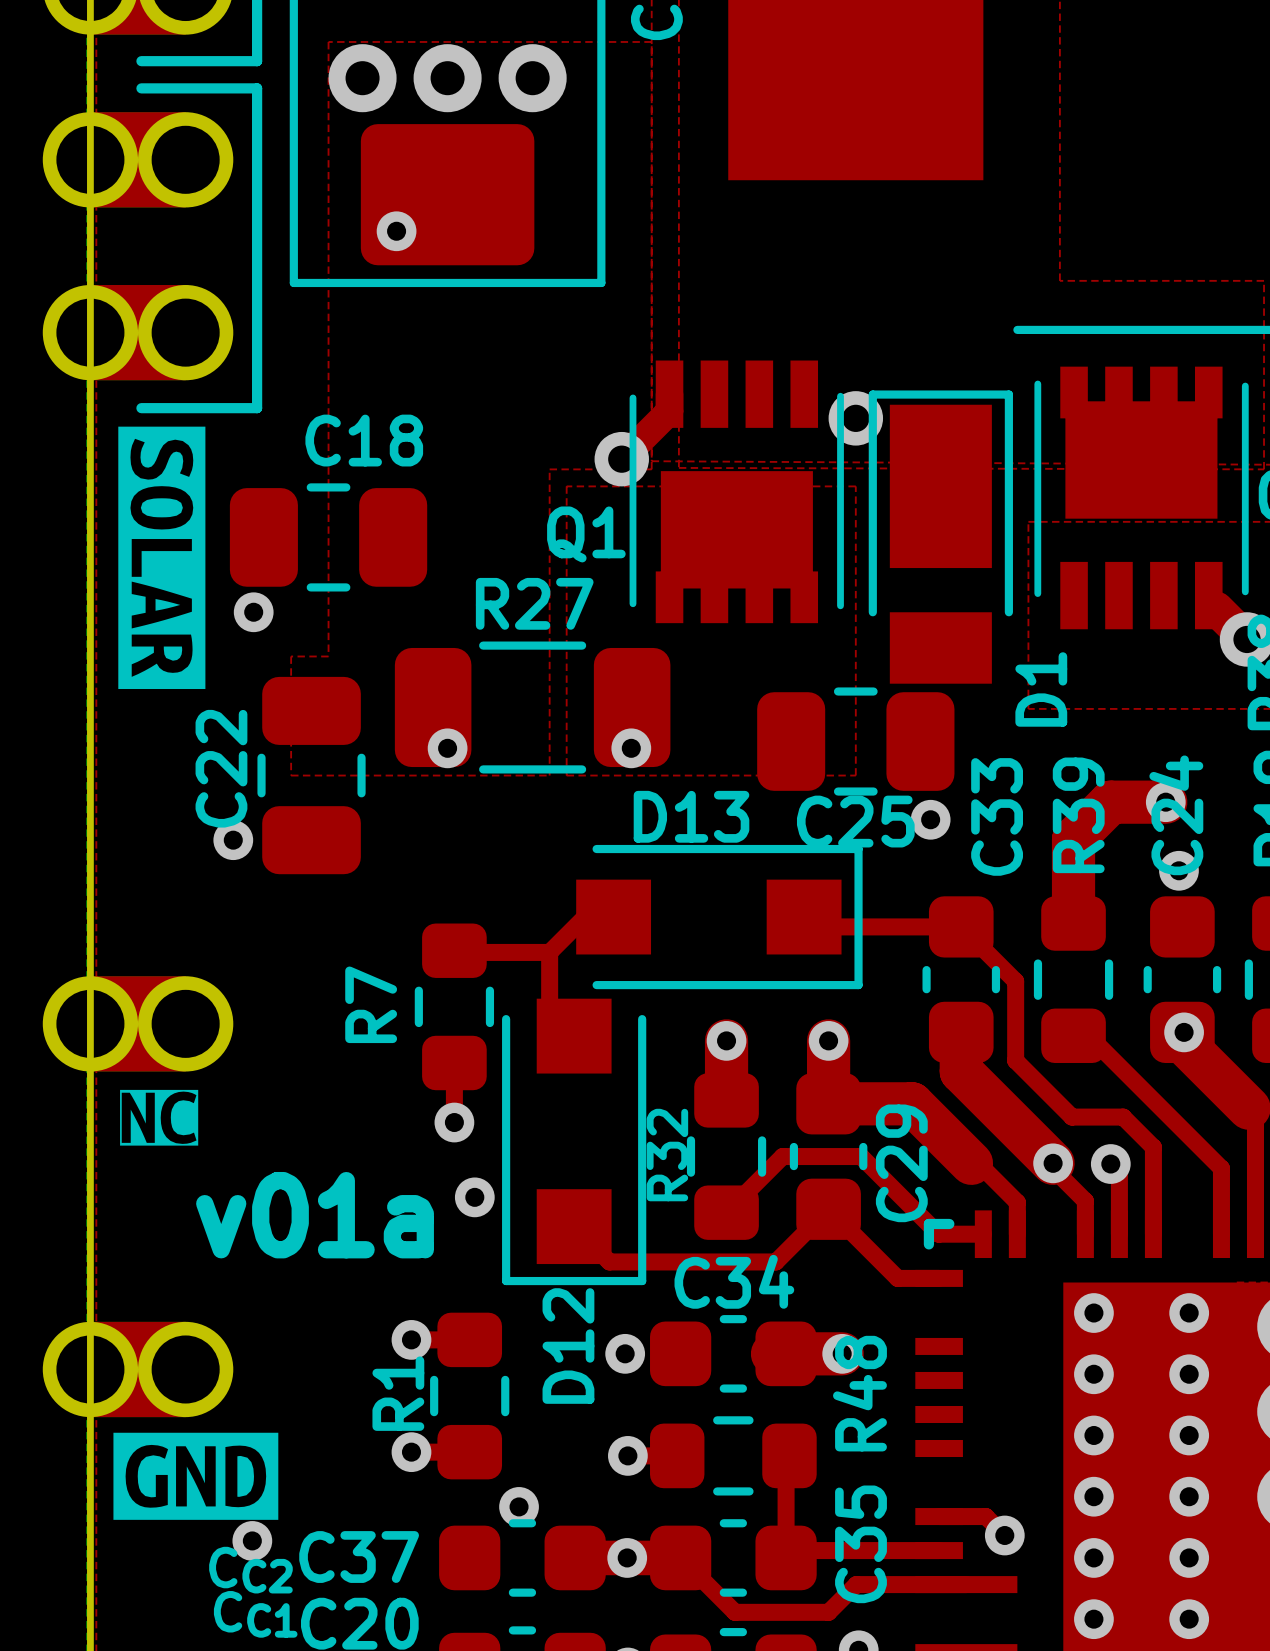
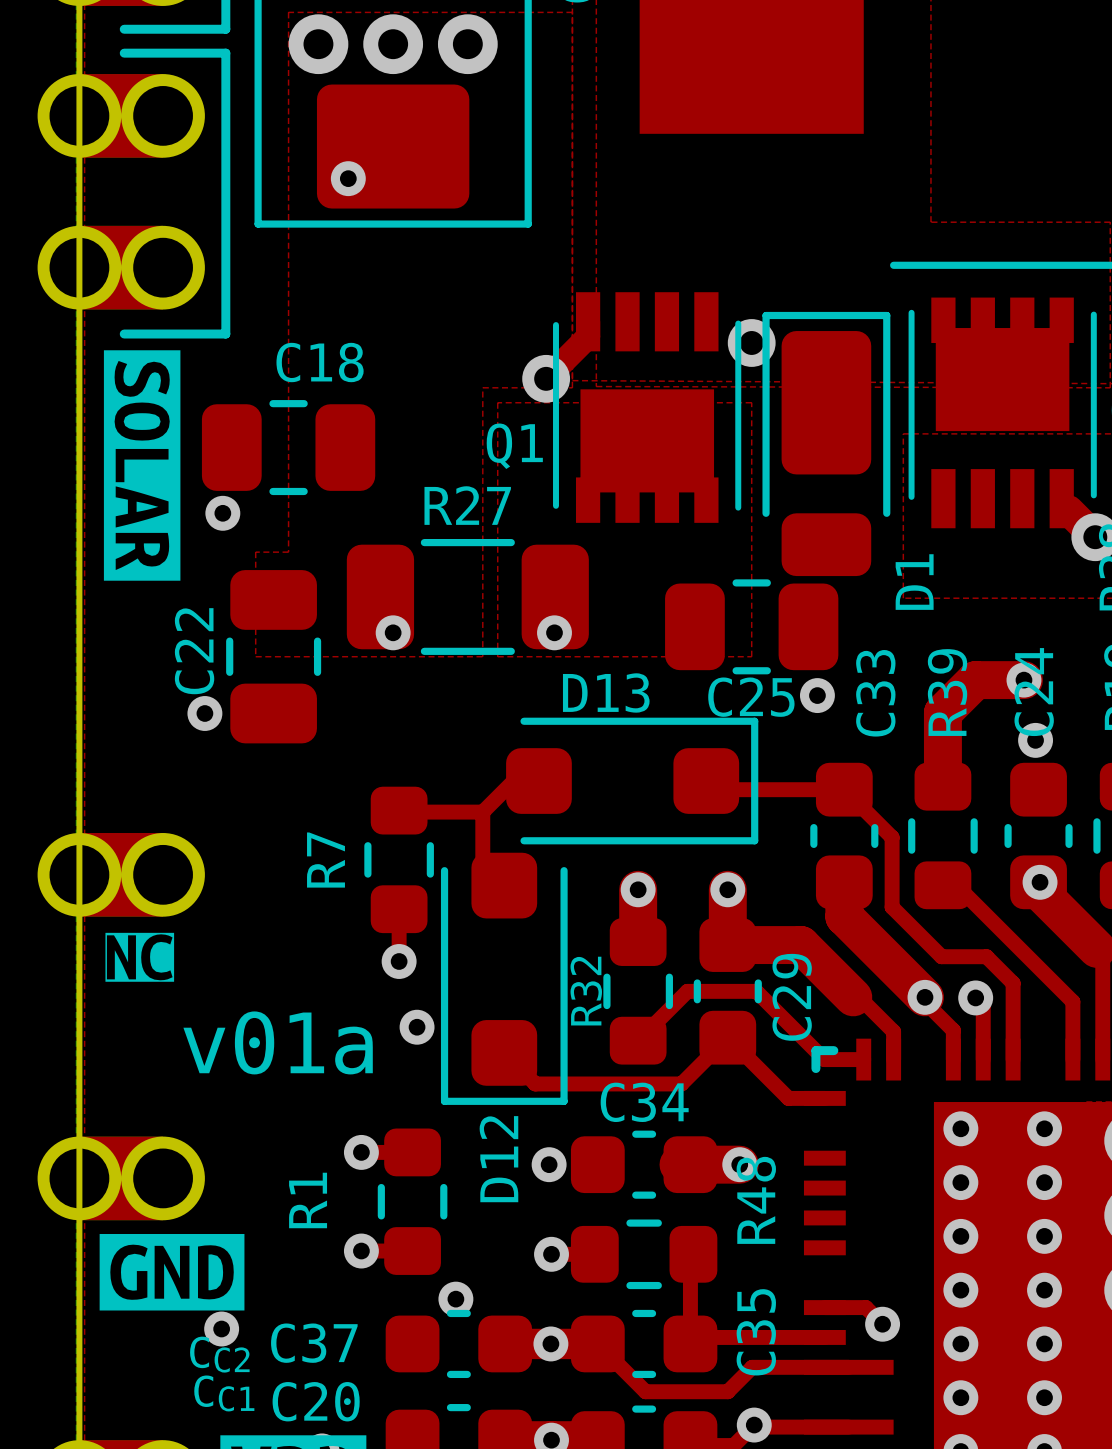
D1 footprint: [868, 390, 1013, 684] -> [762, 311, 891, 577]
D13 footprint: [576, 844, 863, 990] -> [506, 717, 759, 845]
D12 footprint: [502, 998, 647, 1286] -> [440, 852, 568, 1105]
R1 name position: R1 (398, 1393) -> R1 (308, 1200)

